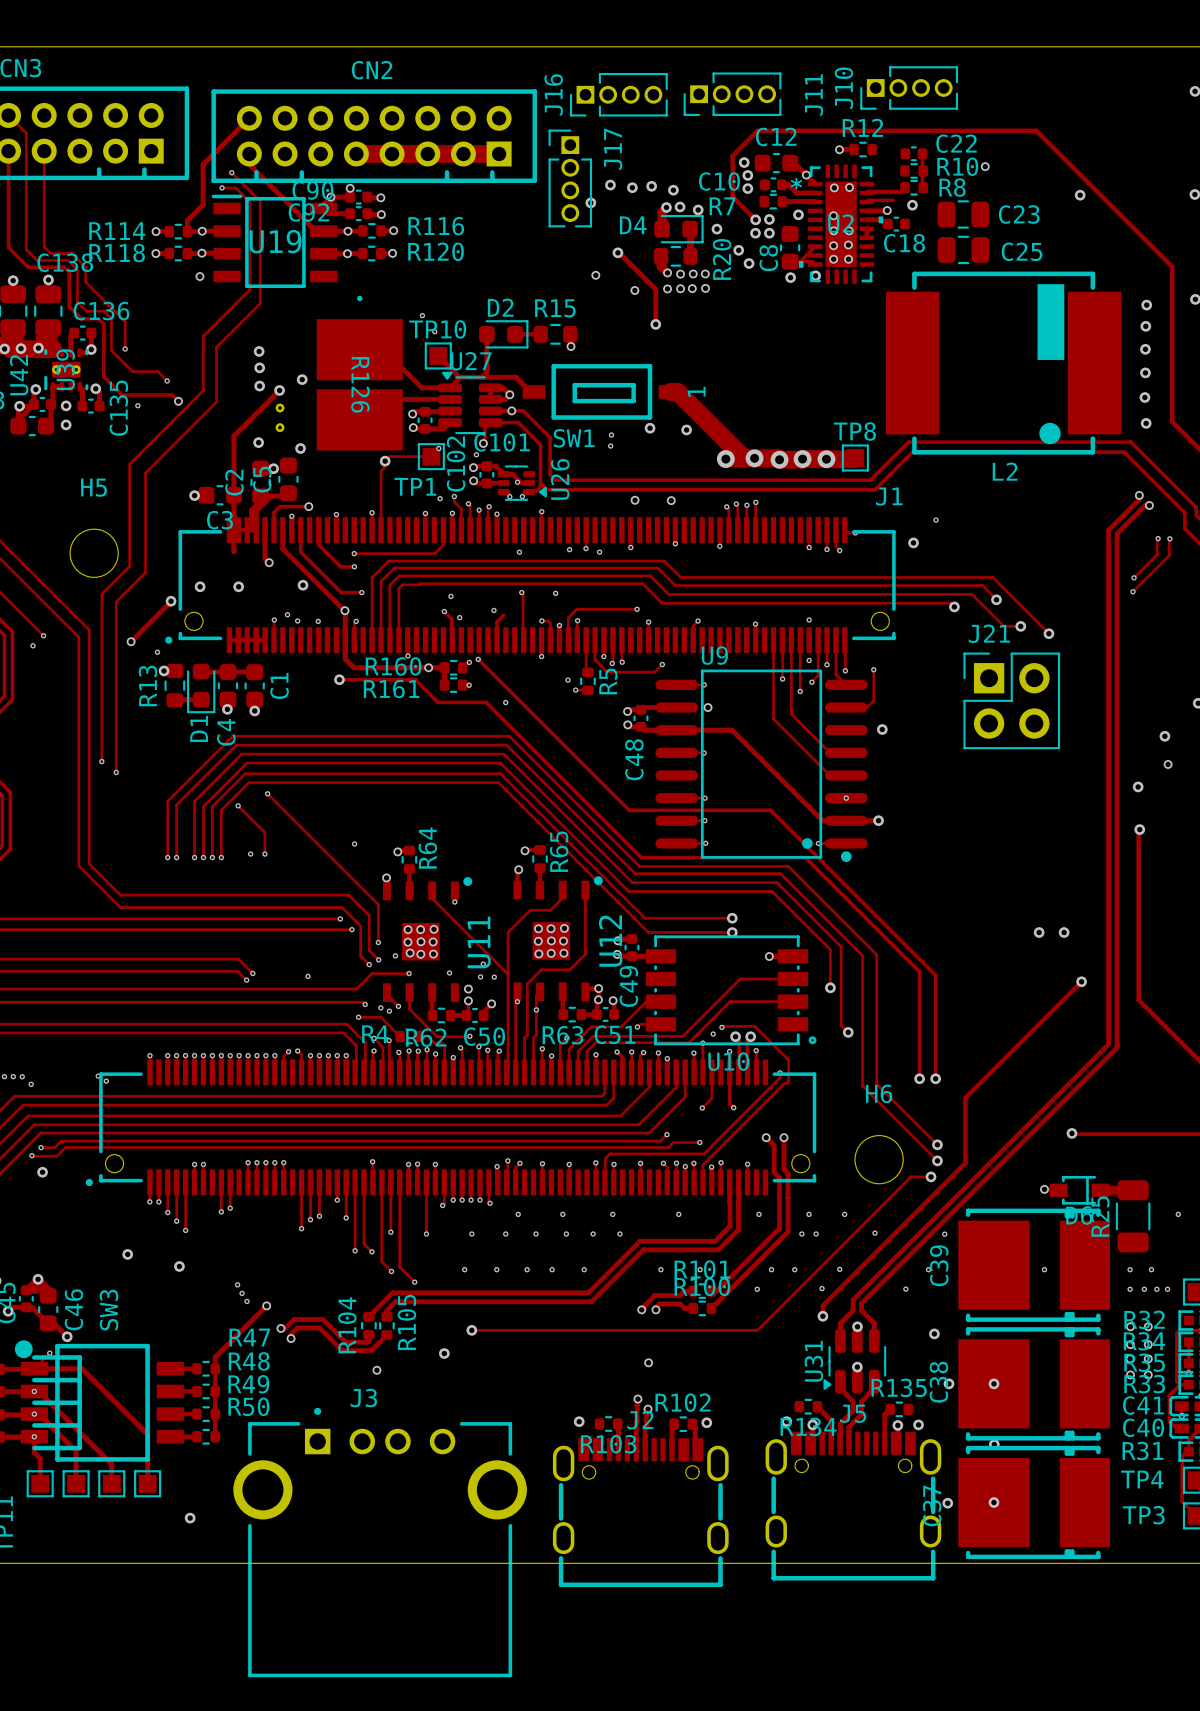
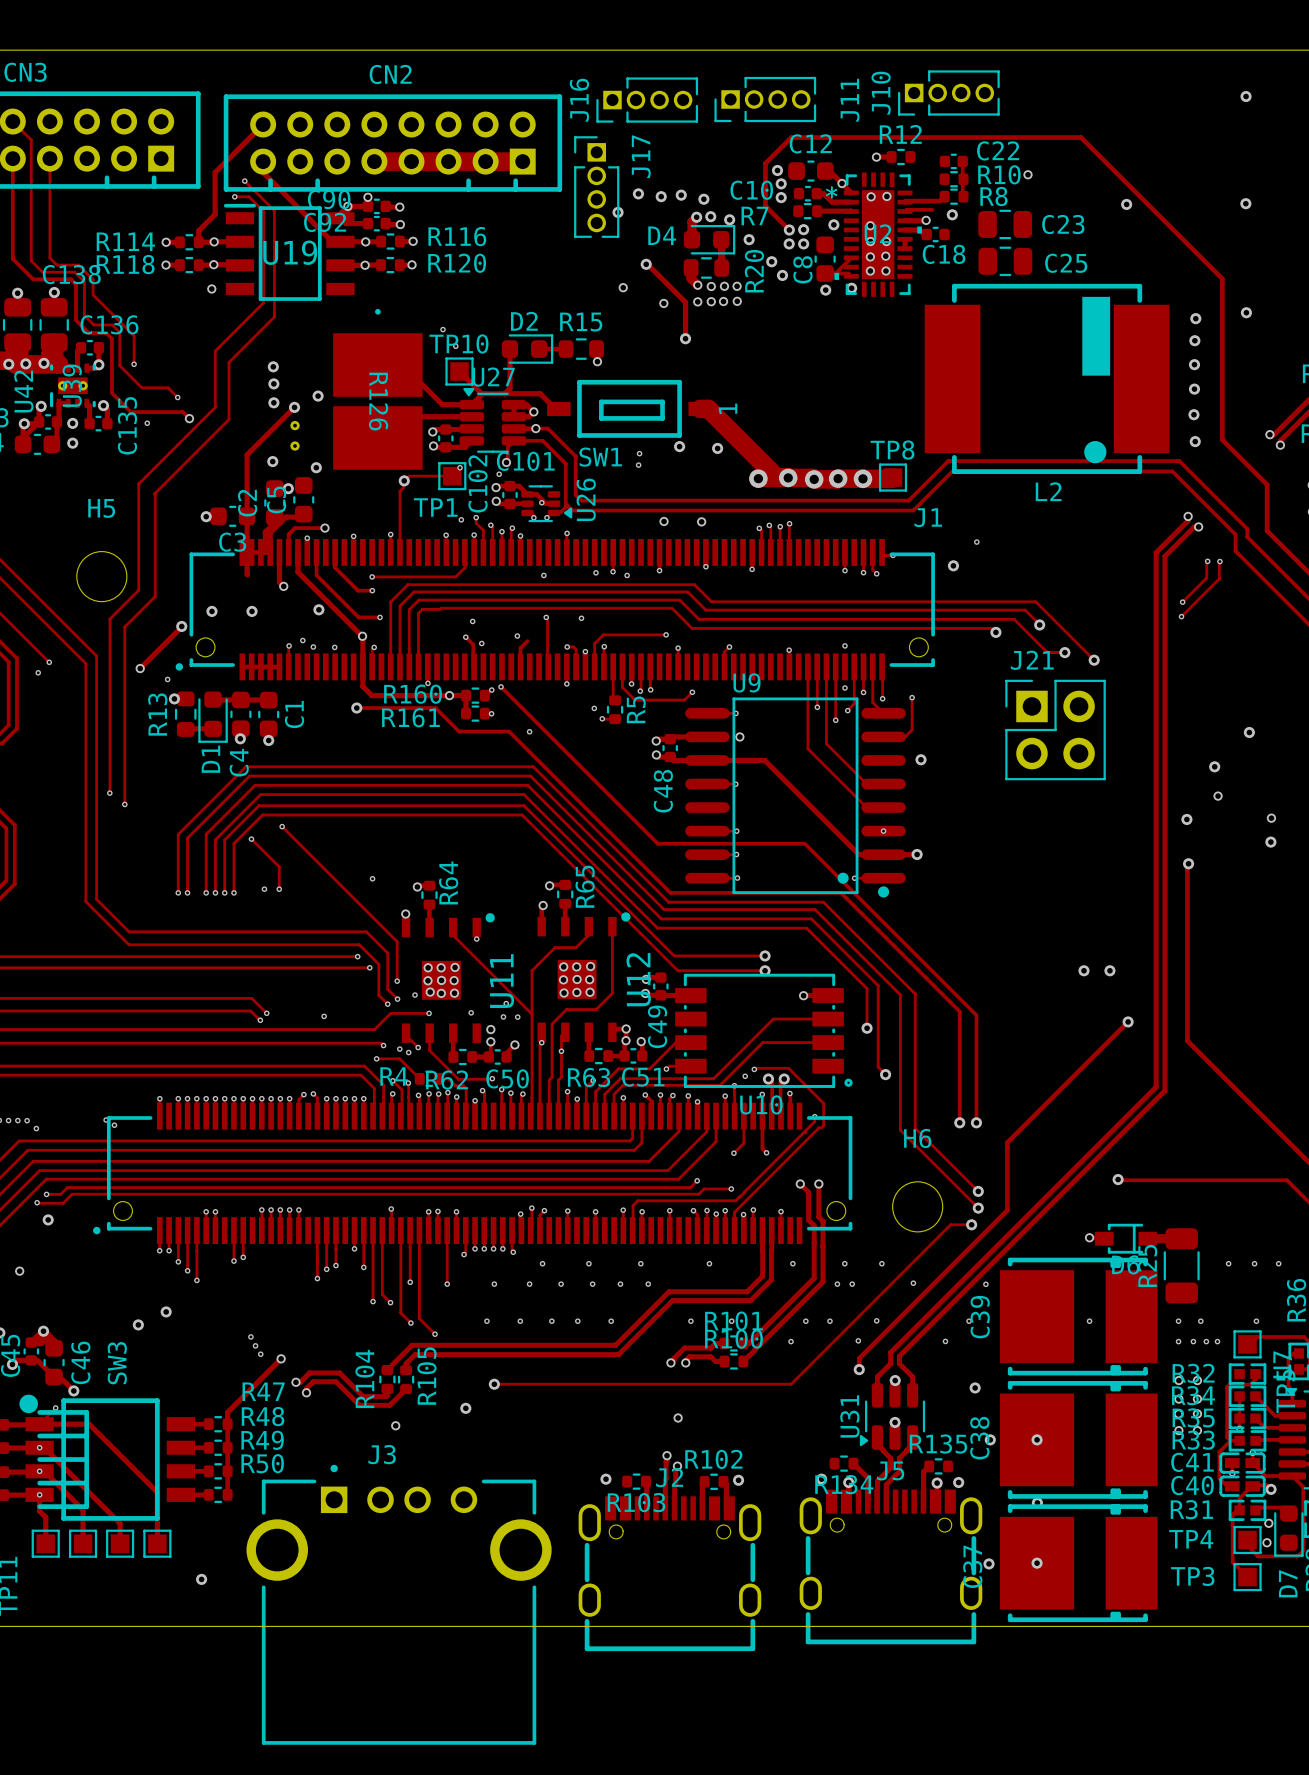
via: none -> (19, 1271)
via: (127, 1254) -> none
via: none -> (166, 1311)
via: (179, 1266) -> none
via: none -> (138, 1324)

